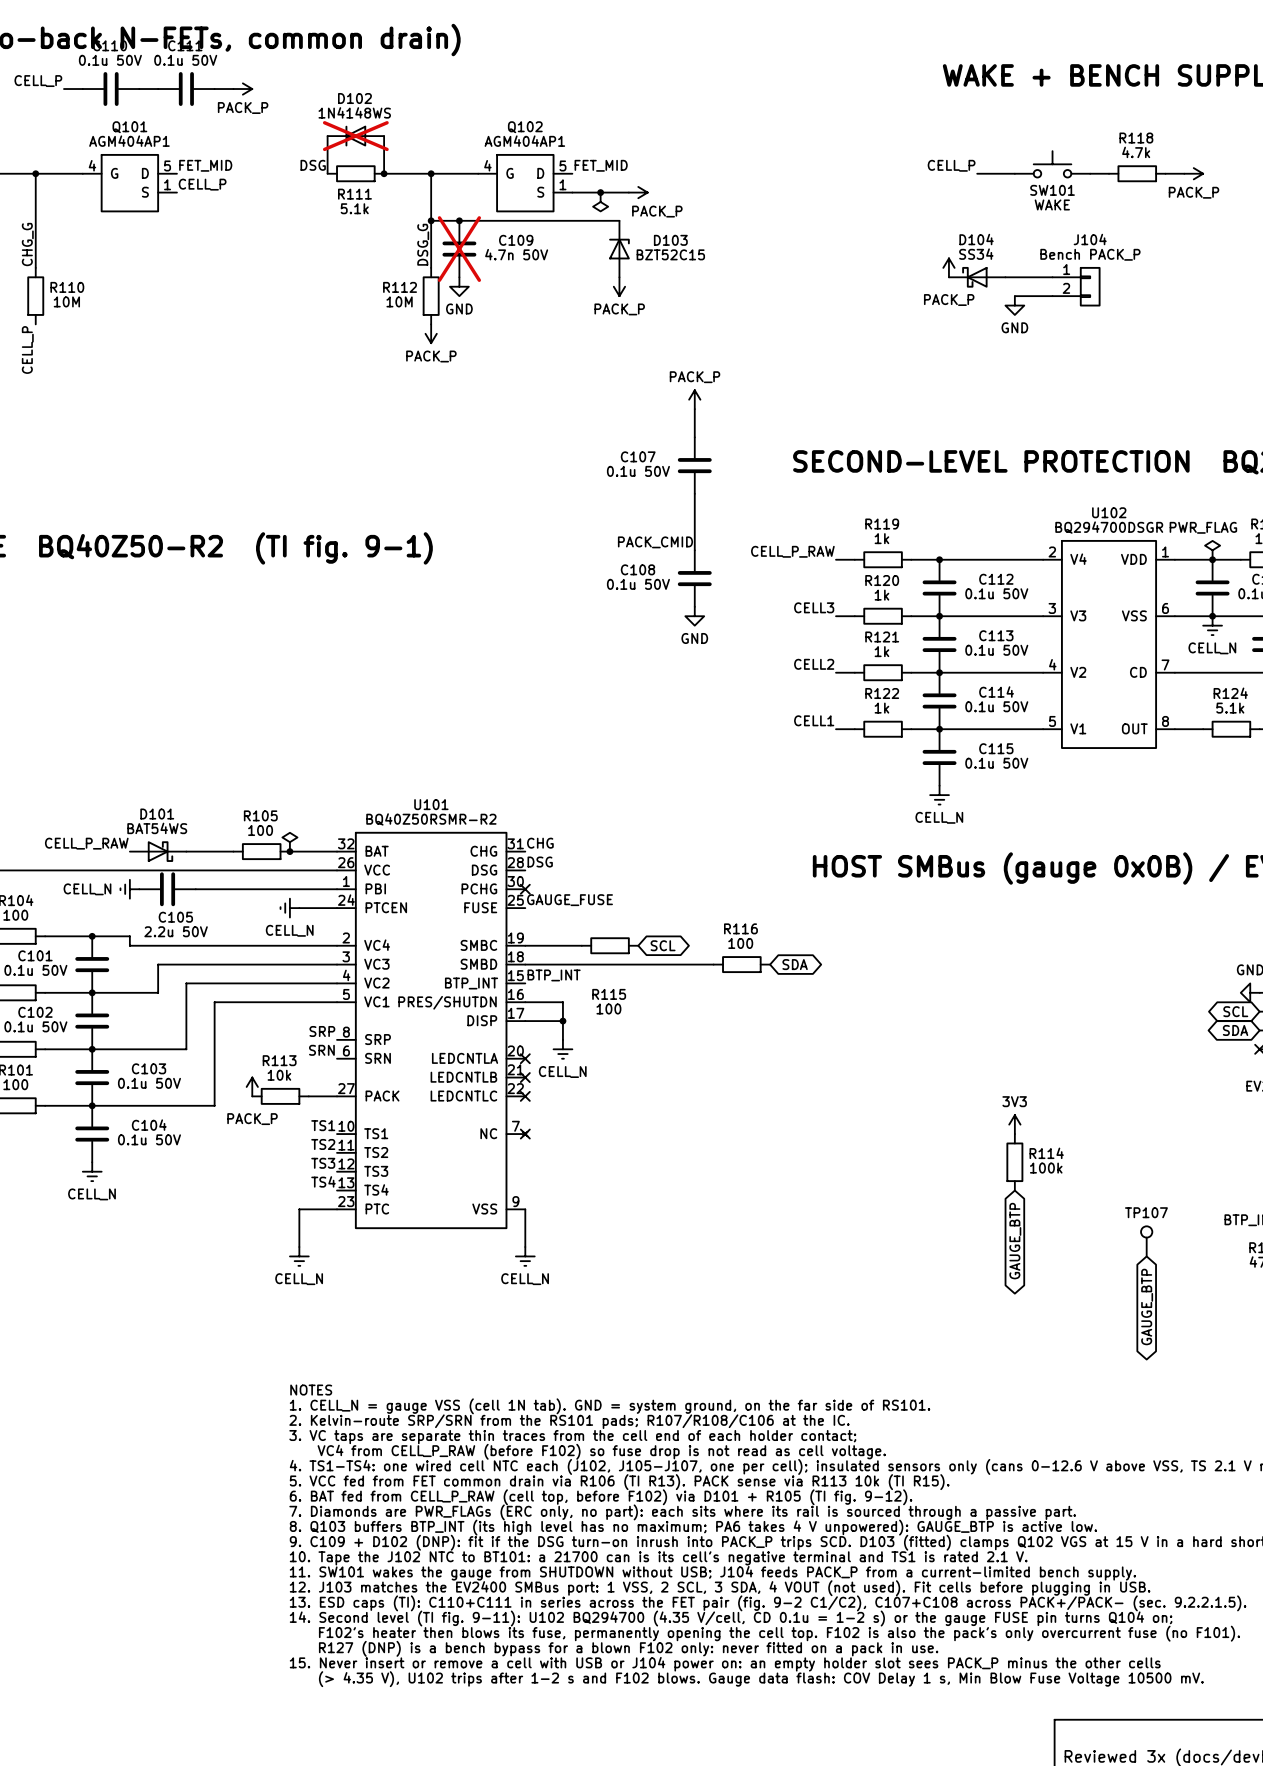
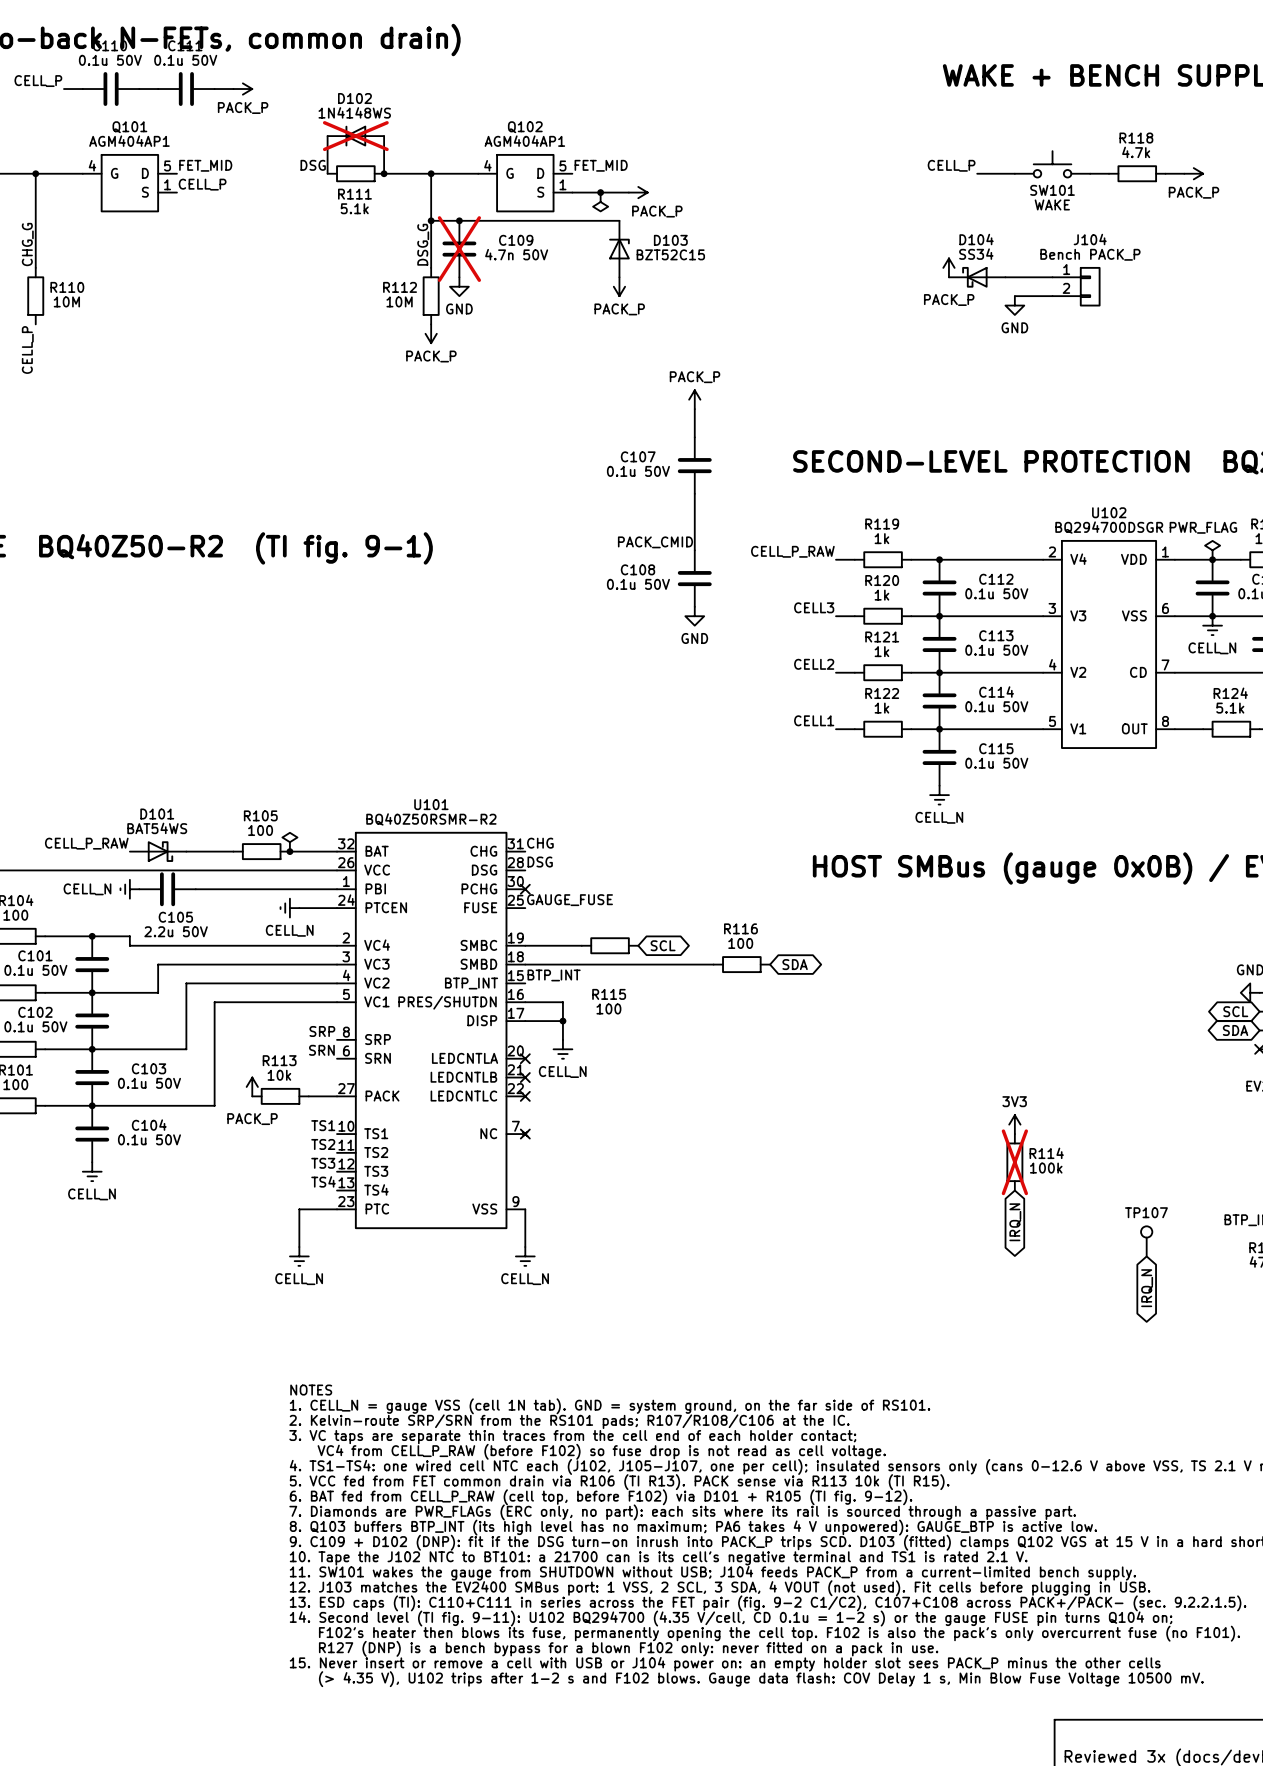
R114 do-not-place cross: none -> (1014, 1162)
global label: GAUGE_BTP (1015, 1241) -> IRQ_N (1015, 1222)
global label: GAUGE_BTP (1147, 1307) -> IRQ_N (1147, 1288)

